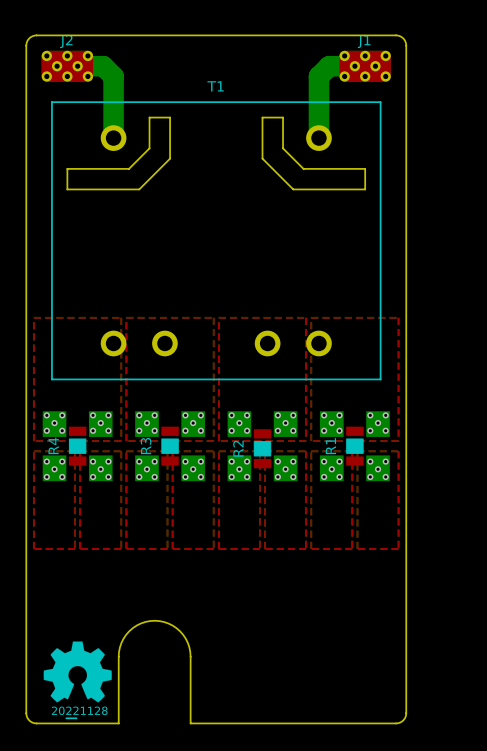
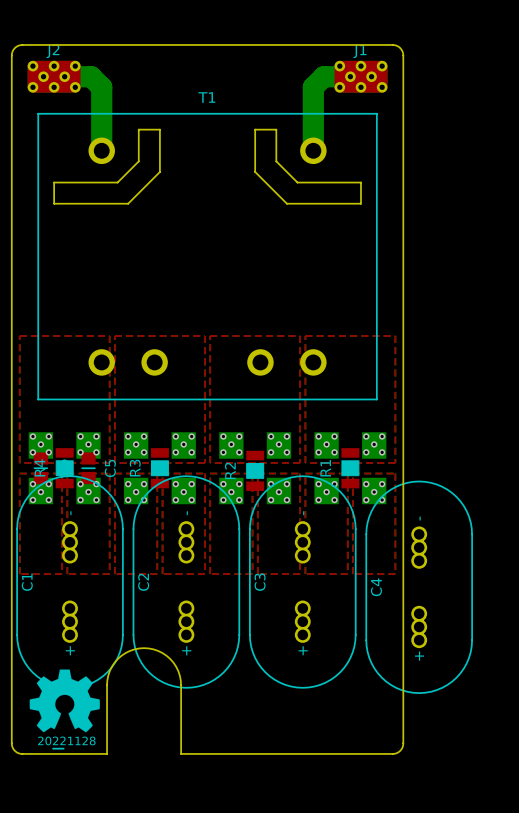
part: none -> (40, 468)
C5: none -> (88, 468)
C1: none -> (69, 582)
C2: none -> (186, 582)
C3: none -> (302, 582)
C4: none -> (419, 587)

